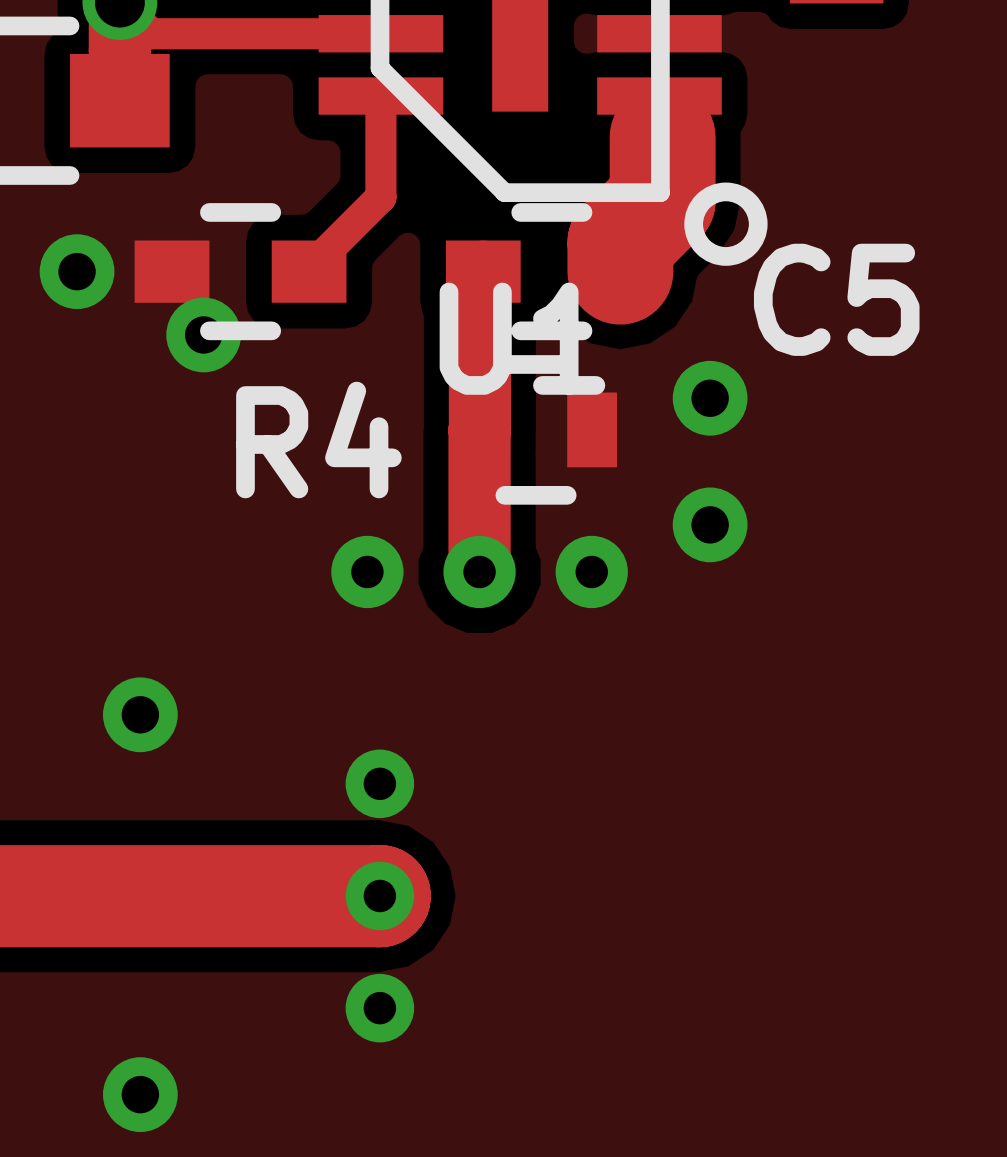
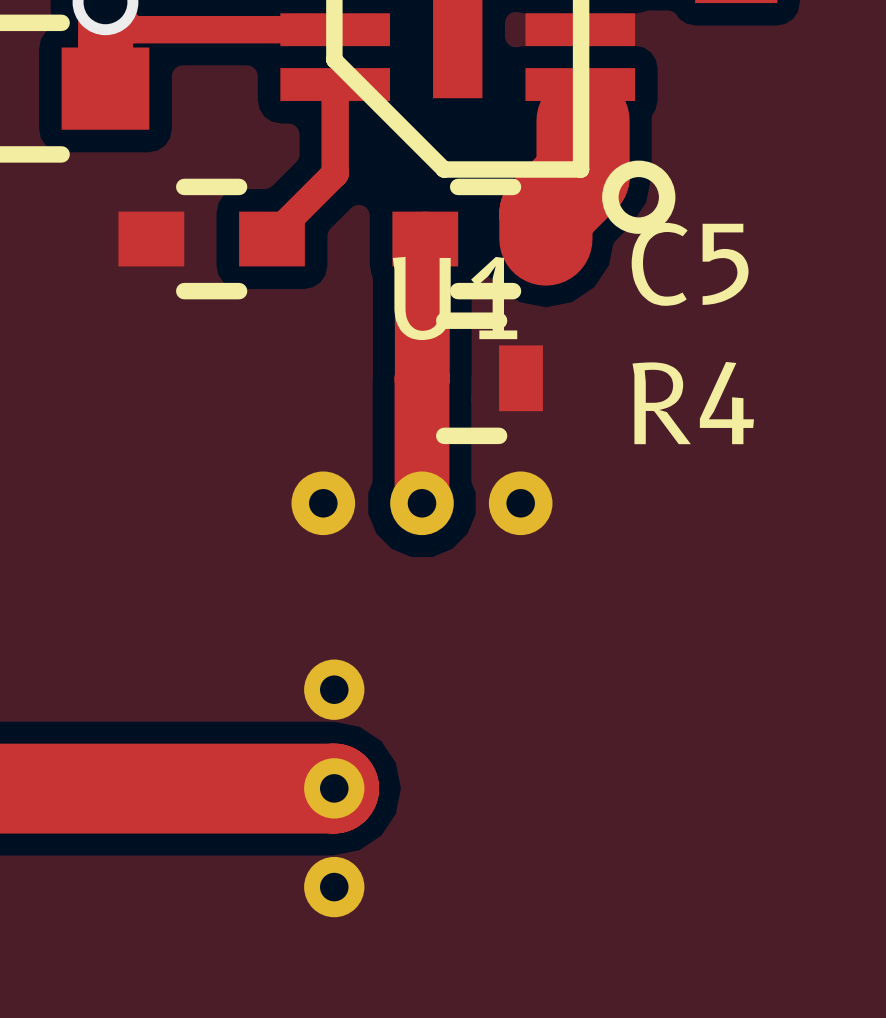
part: (77, 271) -> none
C5 name position: C5 (836, 299) -> C5 (690, 264)
part: (203, 334) -> none
part: (710, 398) -> none
R4 name position: R4 (318, 440) -> R4 (693, 403)
part: (710, 524) -> none
part: (140, 714) -> none
part: (140, 1094) -> none

